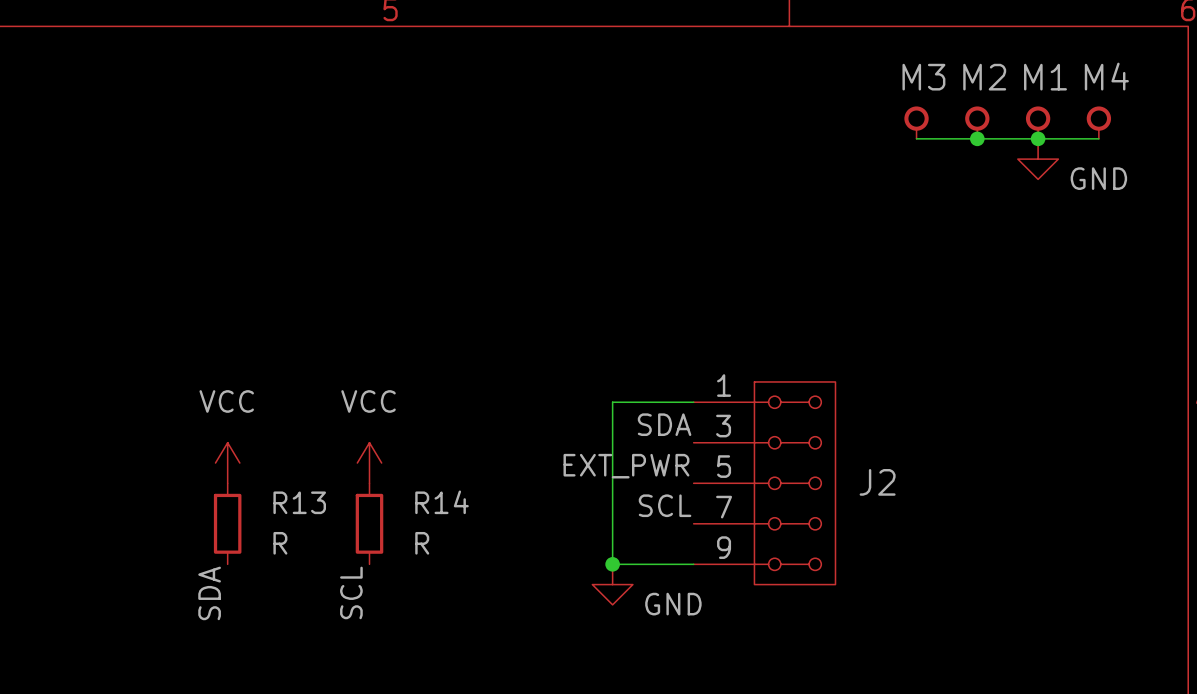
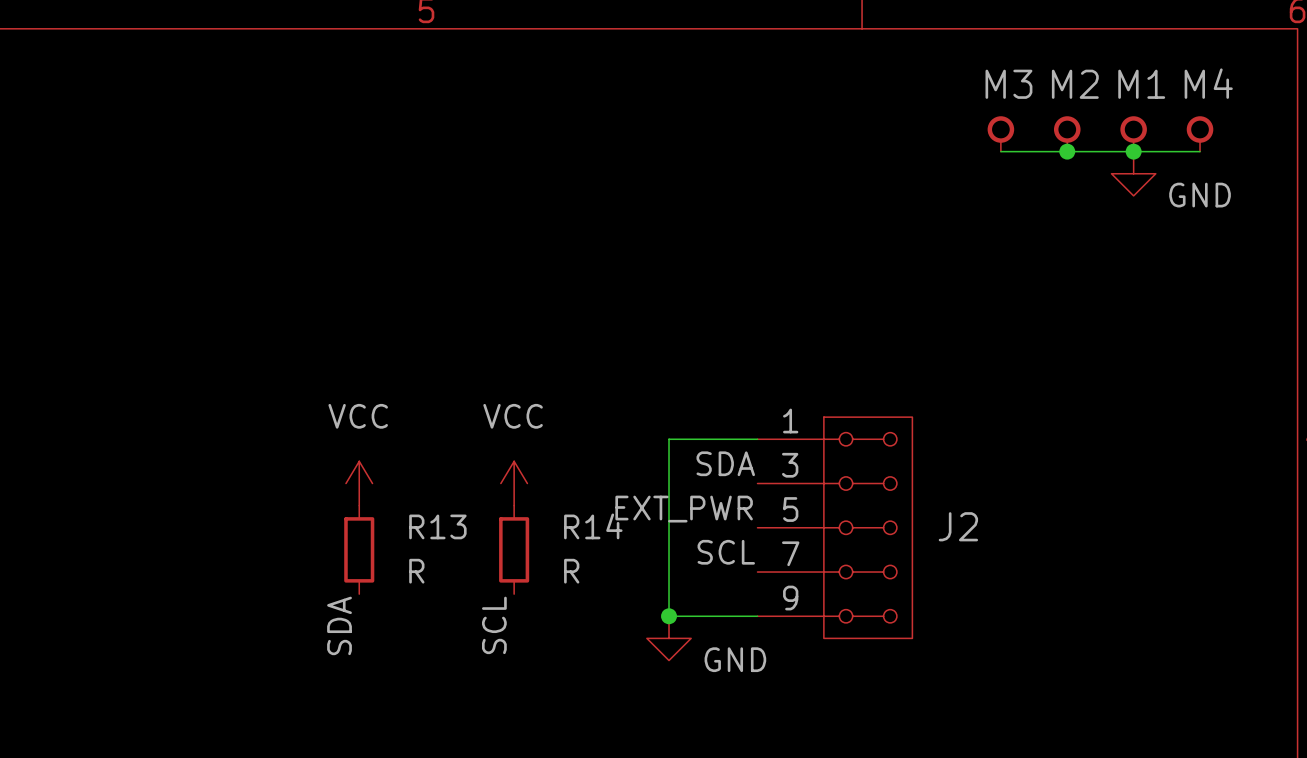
power symbol: none -> VCC (514, 483)
power symbol: VCC (227, 463) -> none
power symbol position: VCC (369, 463) -> VCC (359, 483)
R13 position: (227, 523) -> (359, 549)
R14 position: (369, 523) -> (514, 549)
label position: SCL (351, 592) -> SCL (494, 625)
label position: SDA (209, 593) -> SDA (339, 625)

